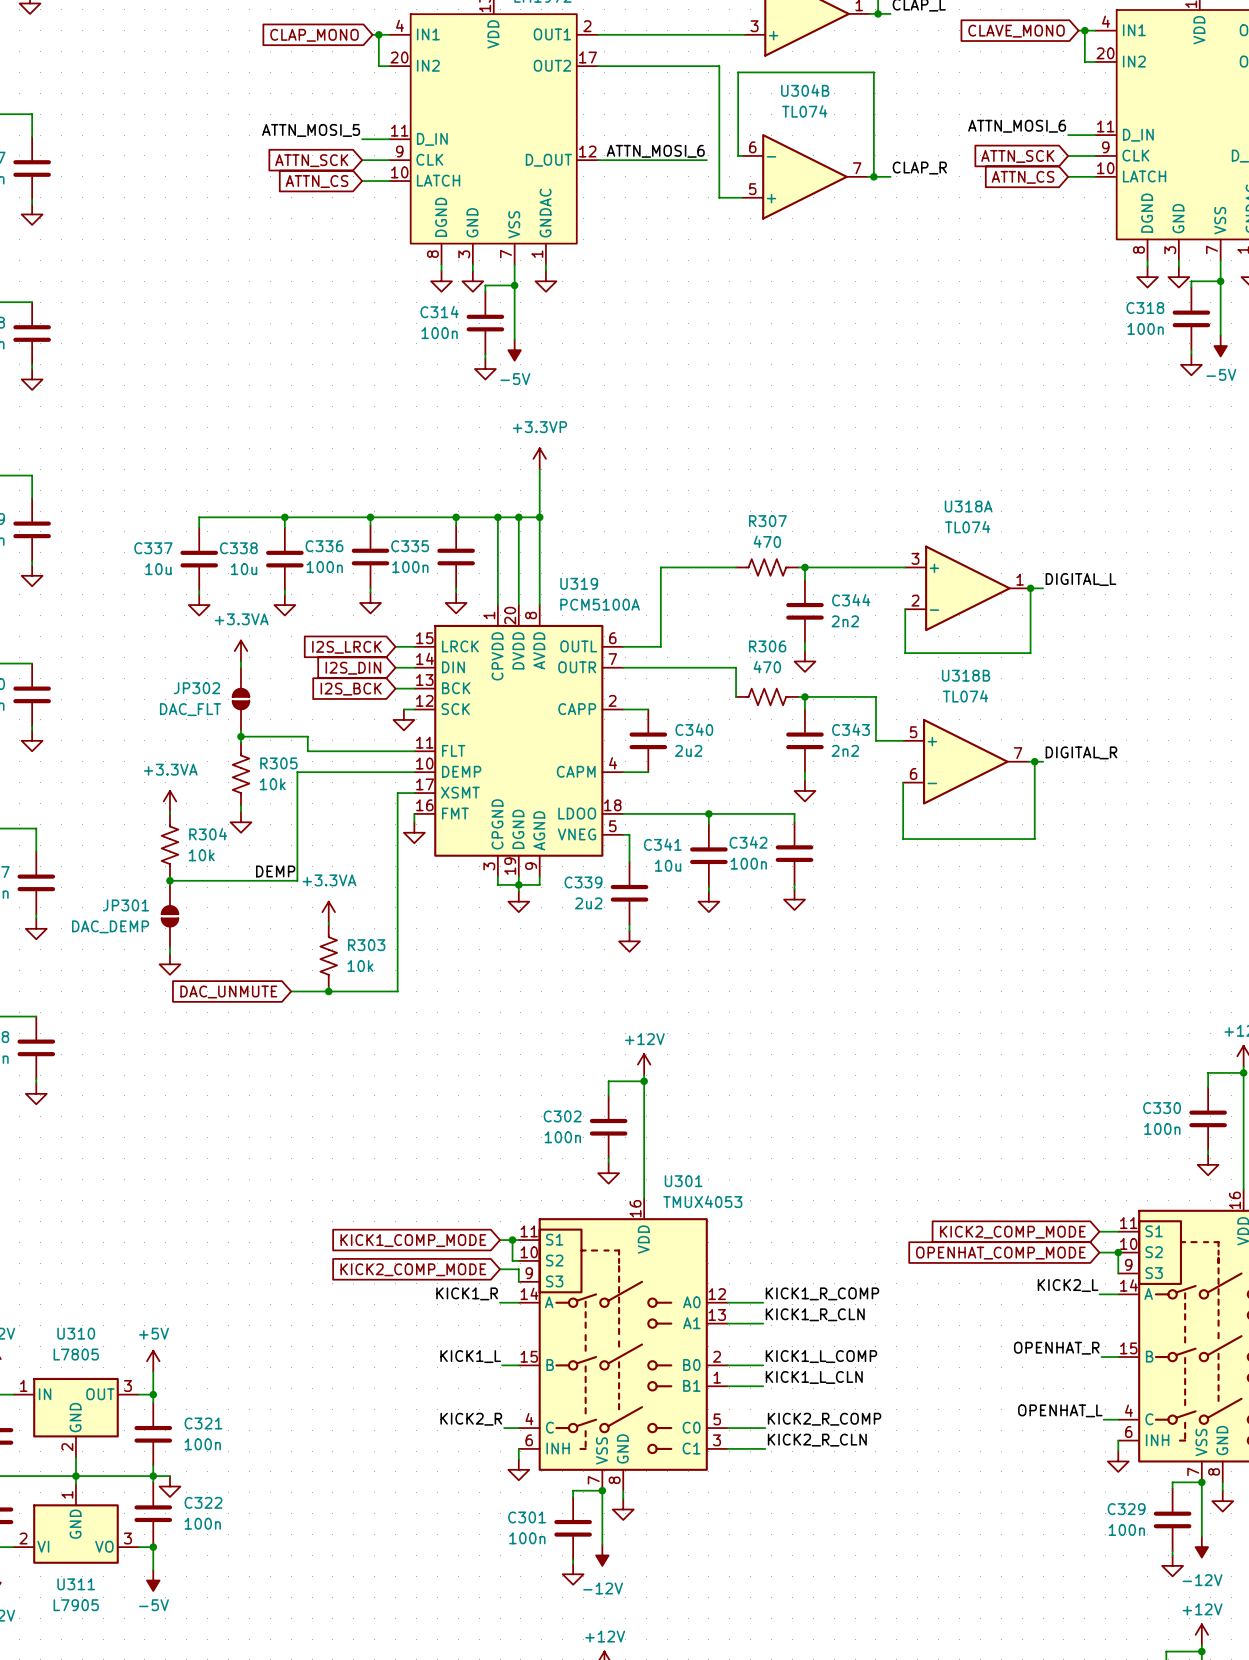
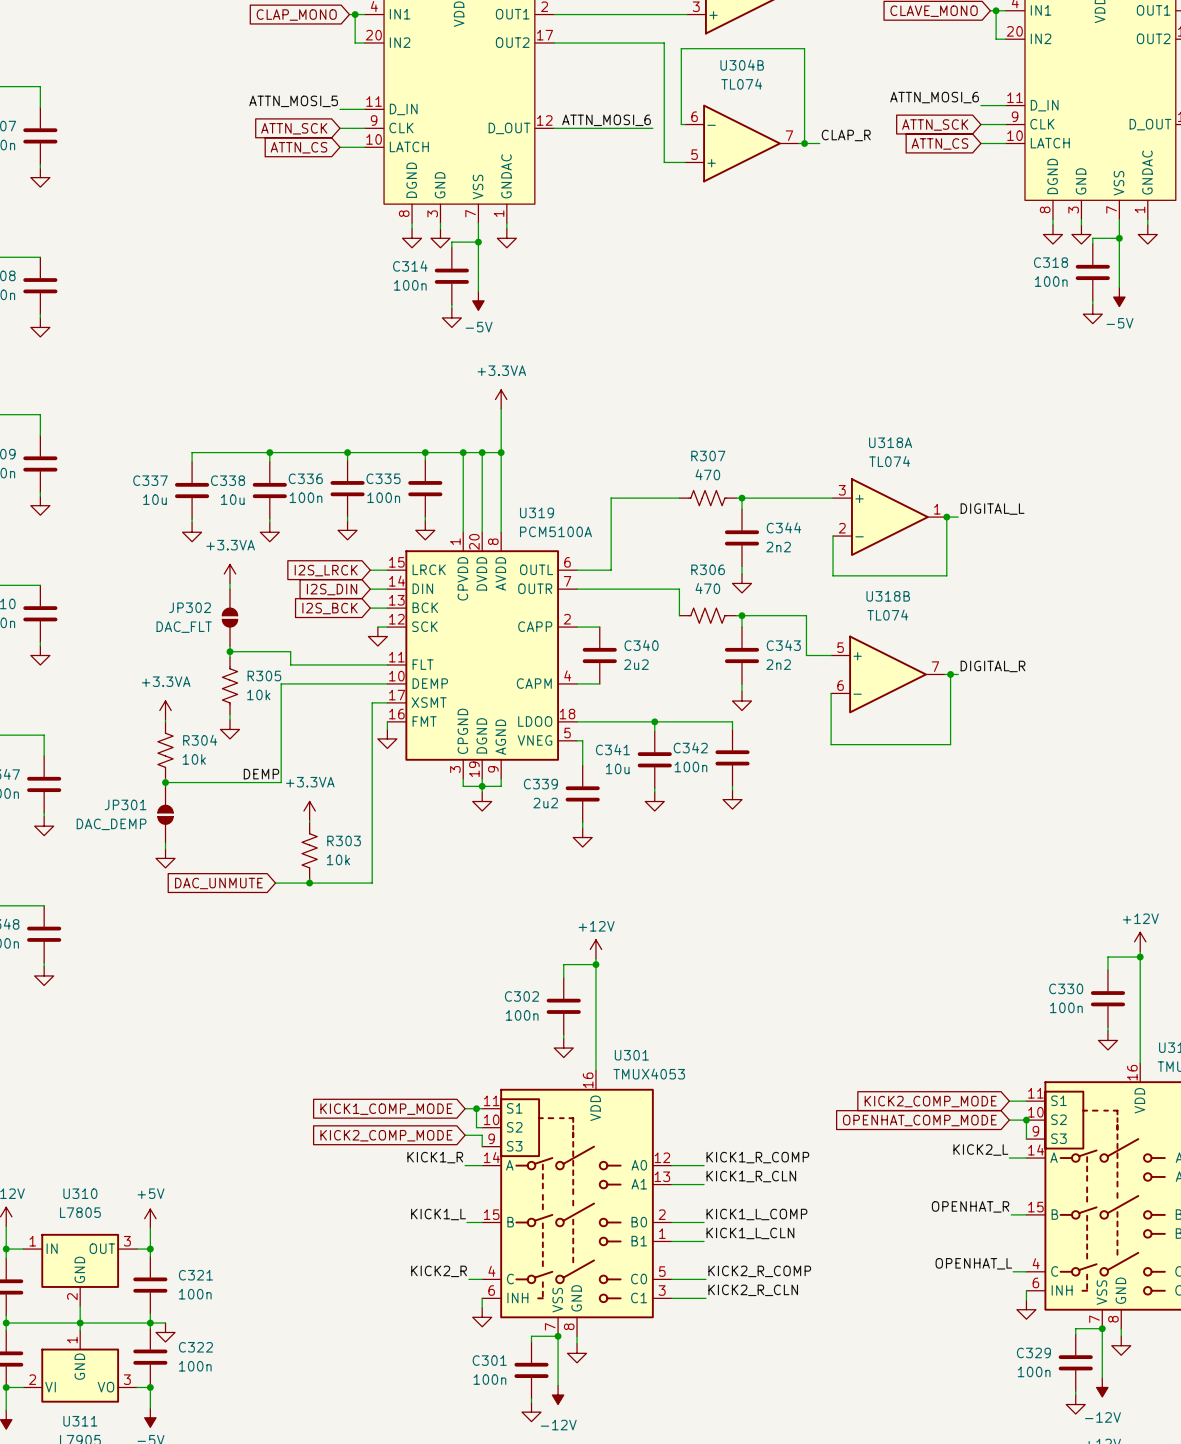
power symbol: +3.3VP (539, 458) -> +3.3VA (501, 399)

